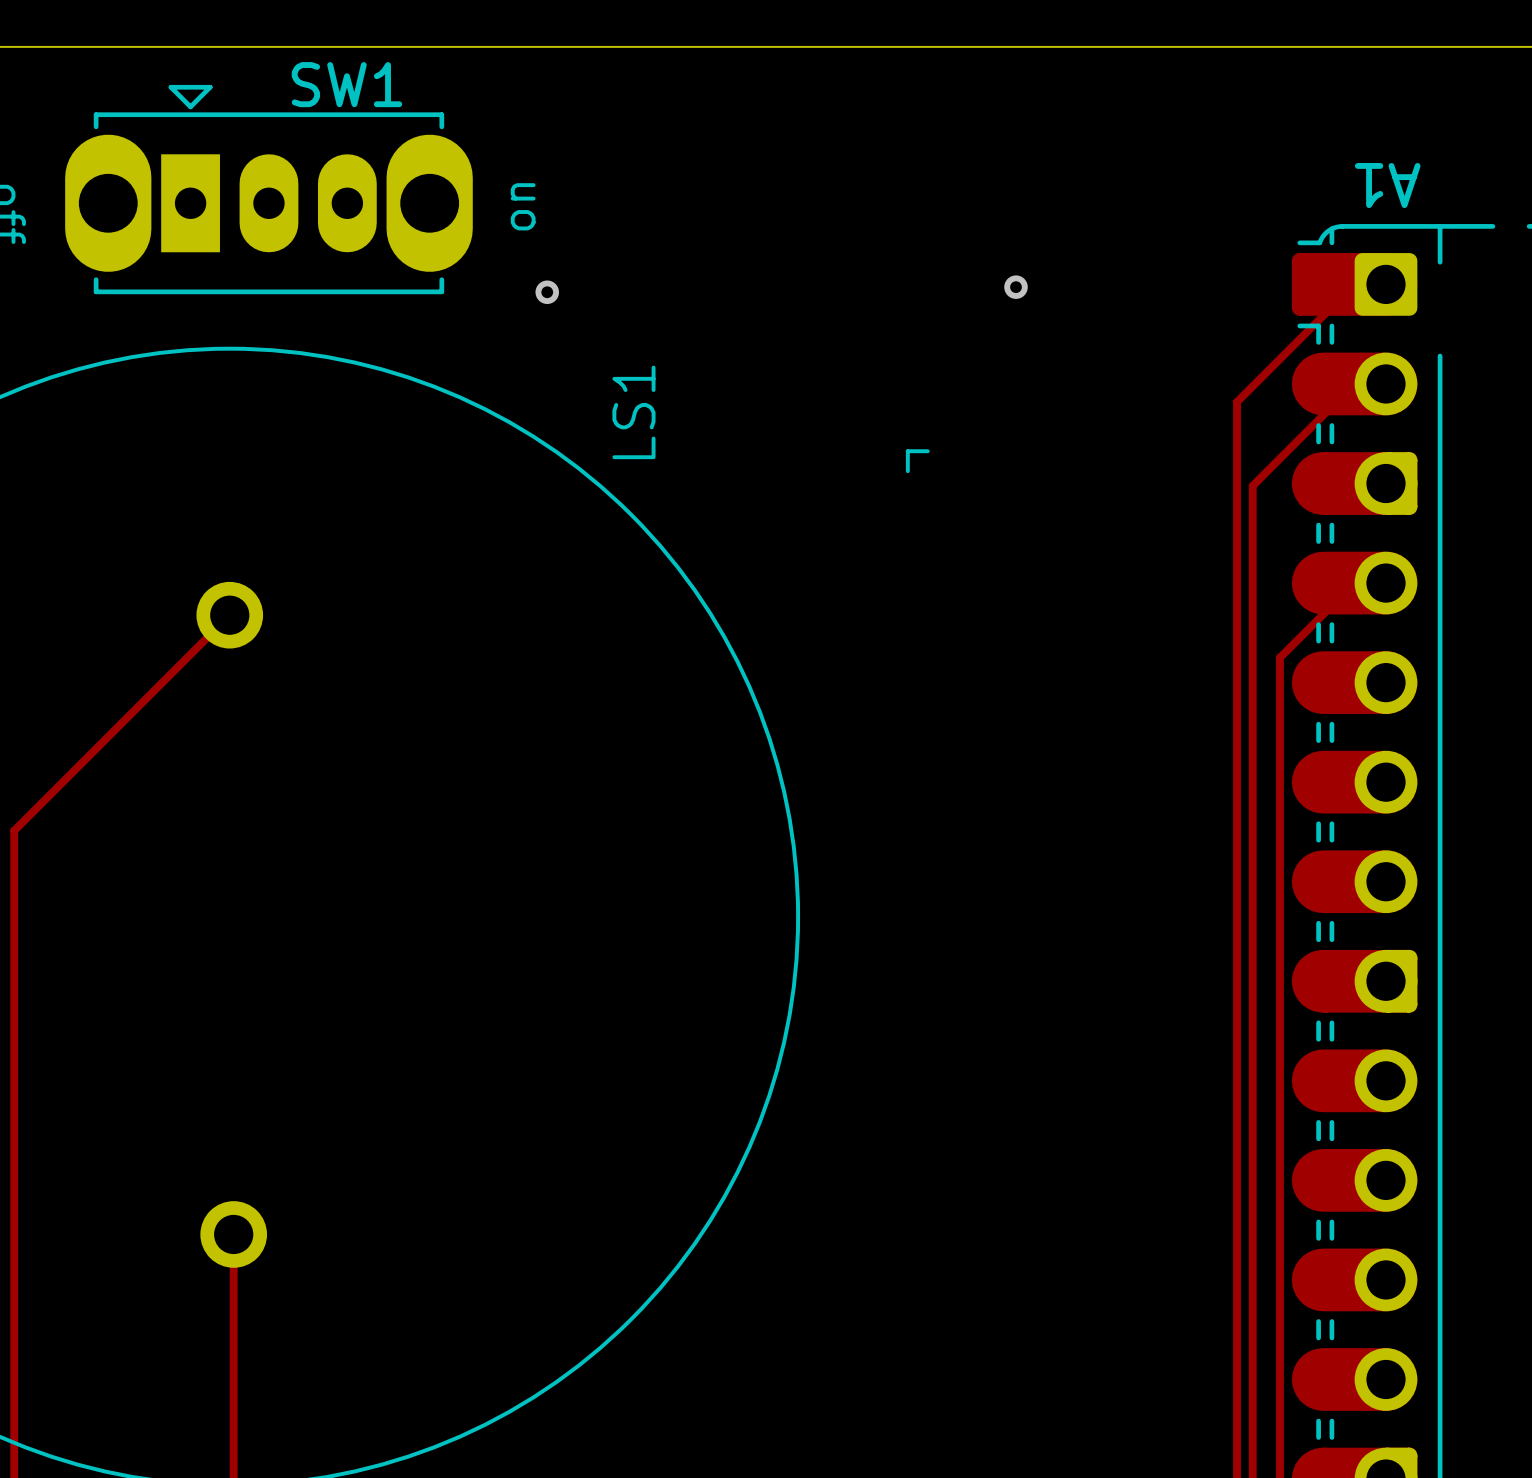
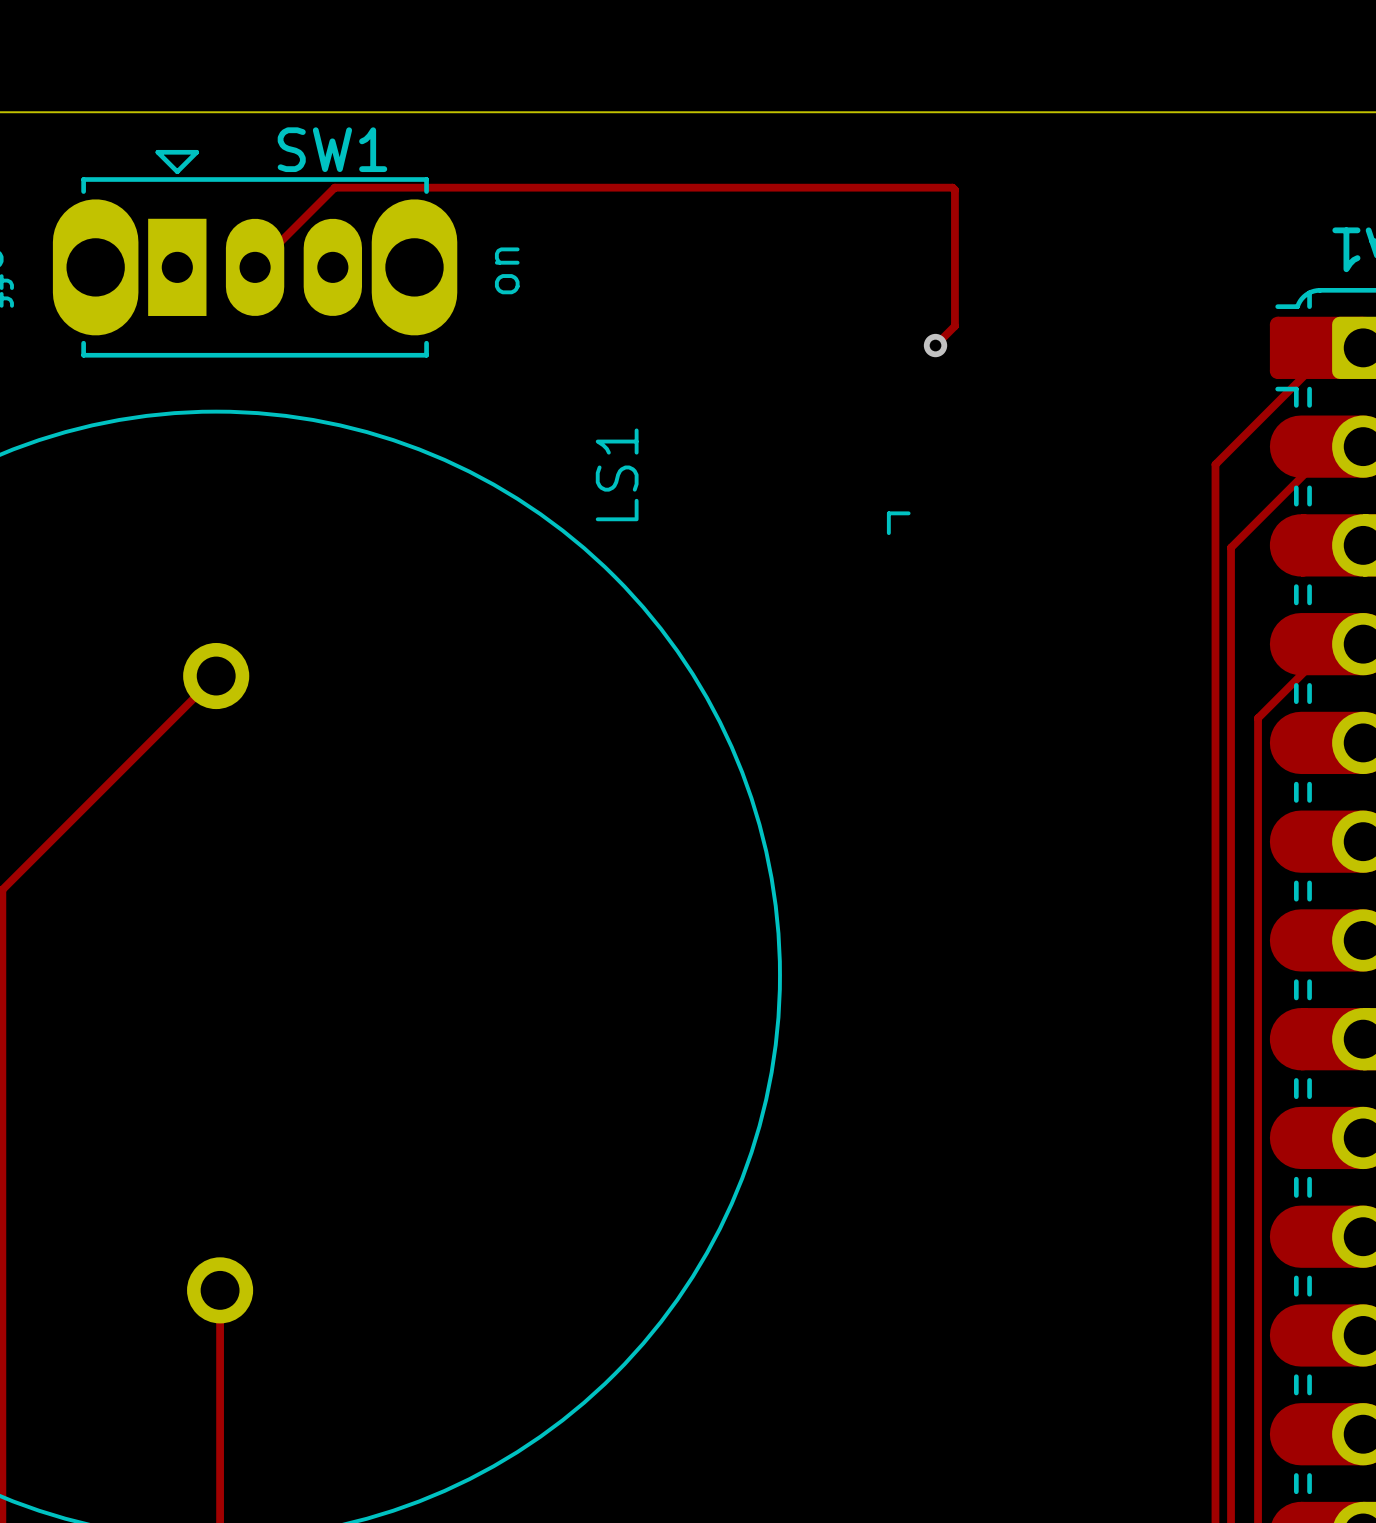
track: none -> (255, 267) (334, 187) (952, 187) (954, 190) (954, 326) (935, 345)
via position: (1016, 287) -> (935, 345)
via: (547, 292) -> none

